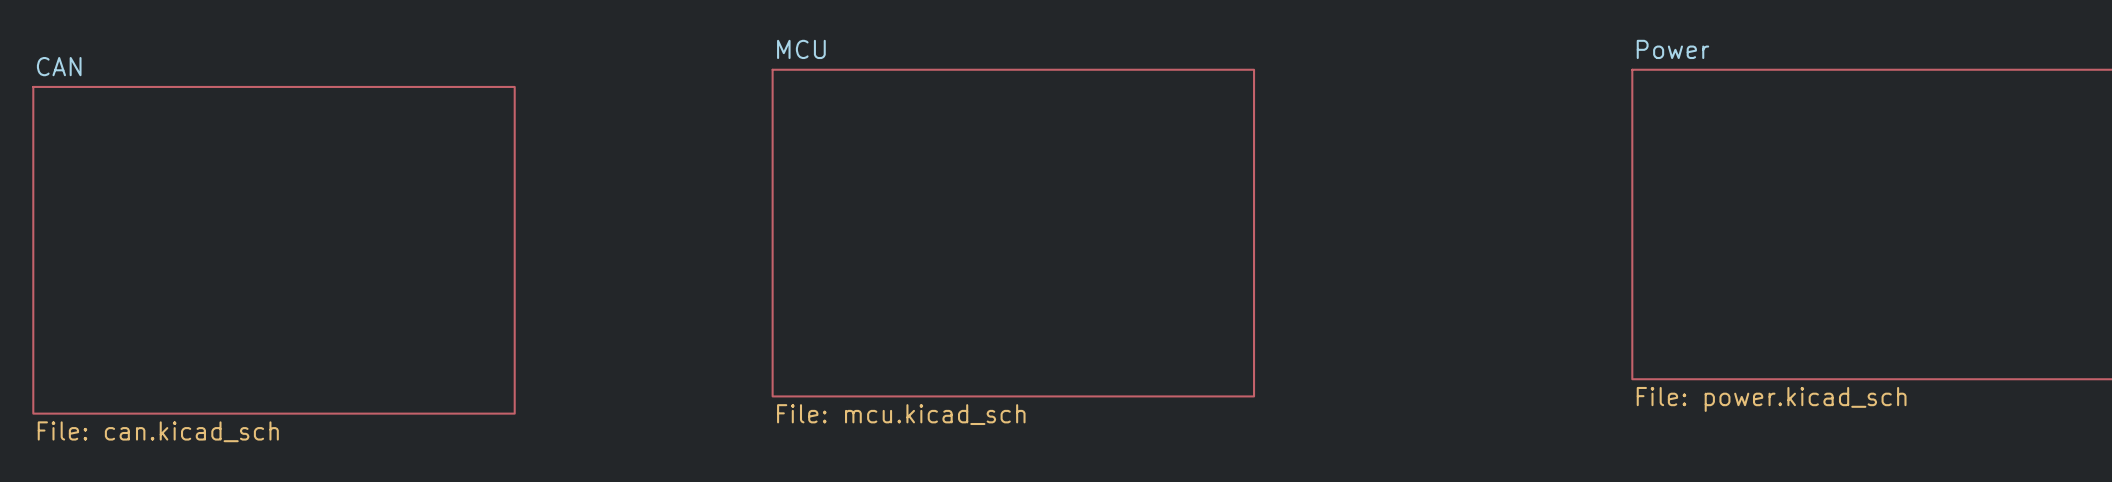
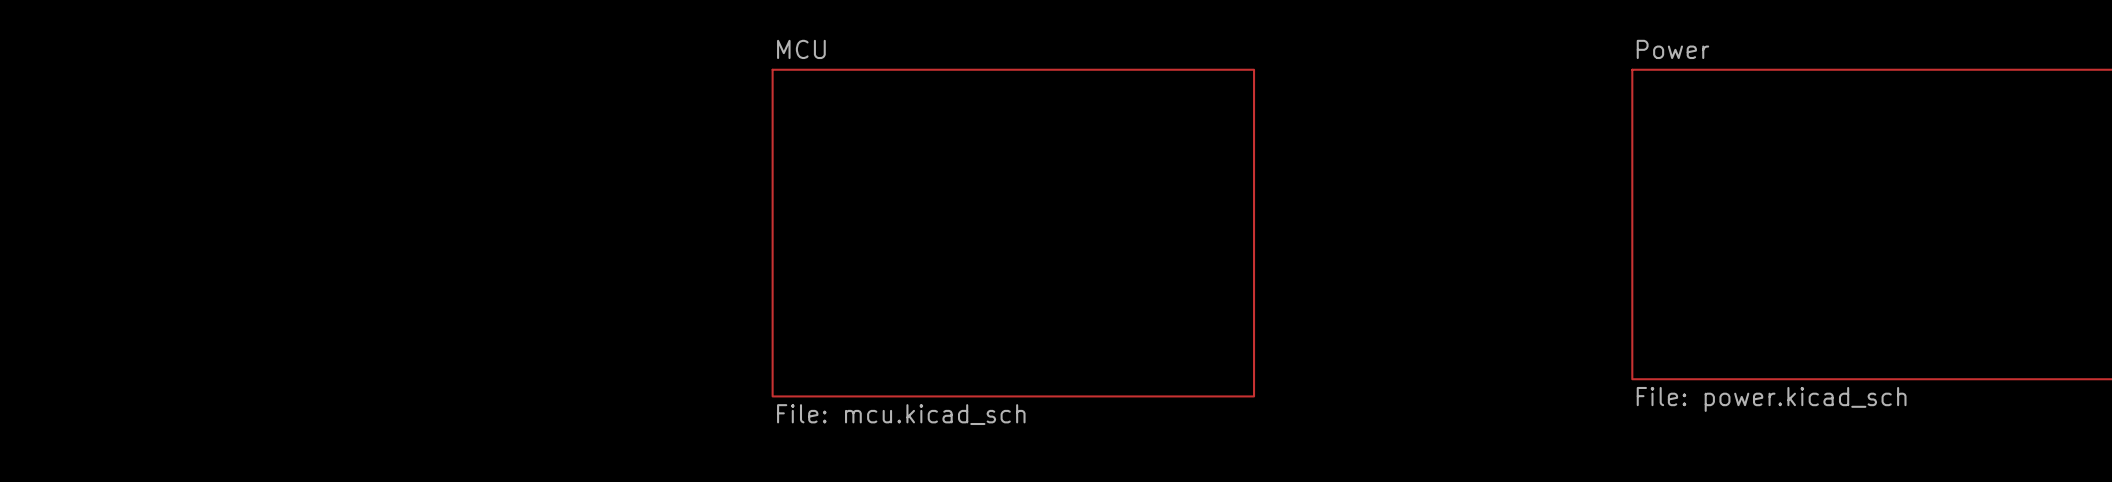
sheet CAN: File: can.kicad_sch (274, 250) -> none

